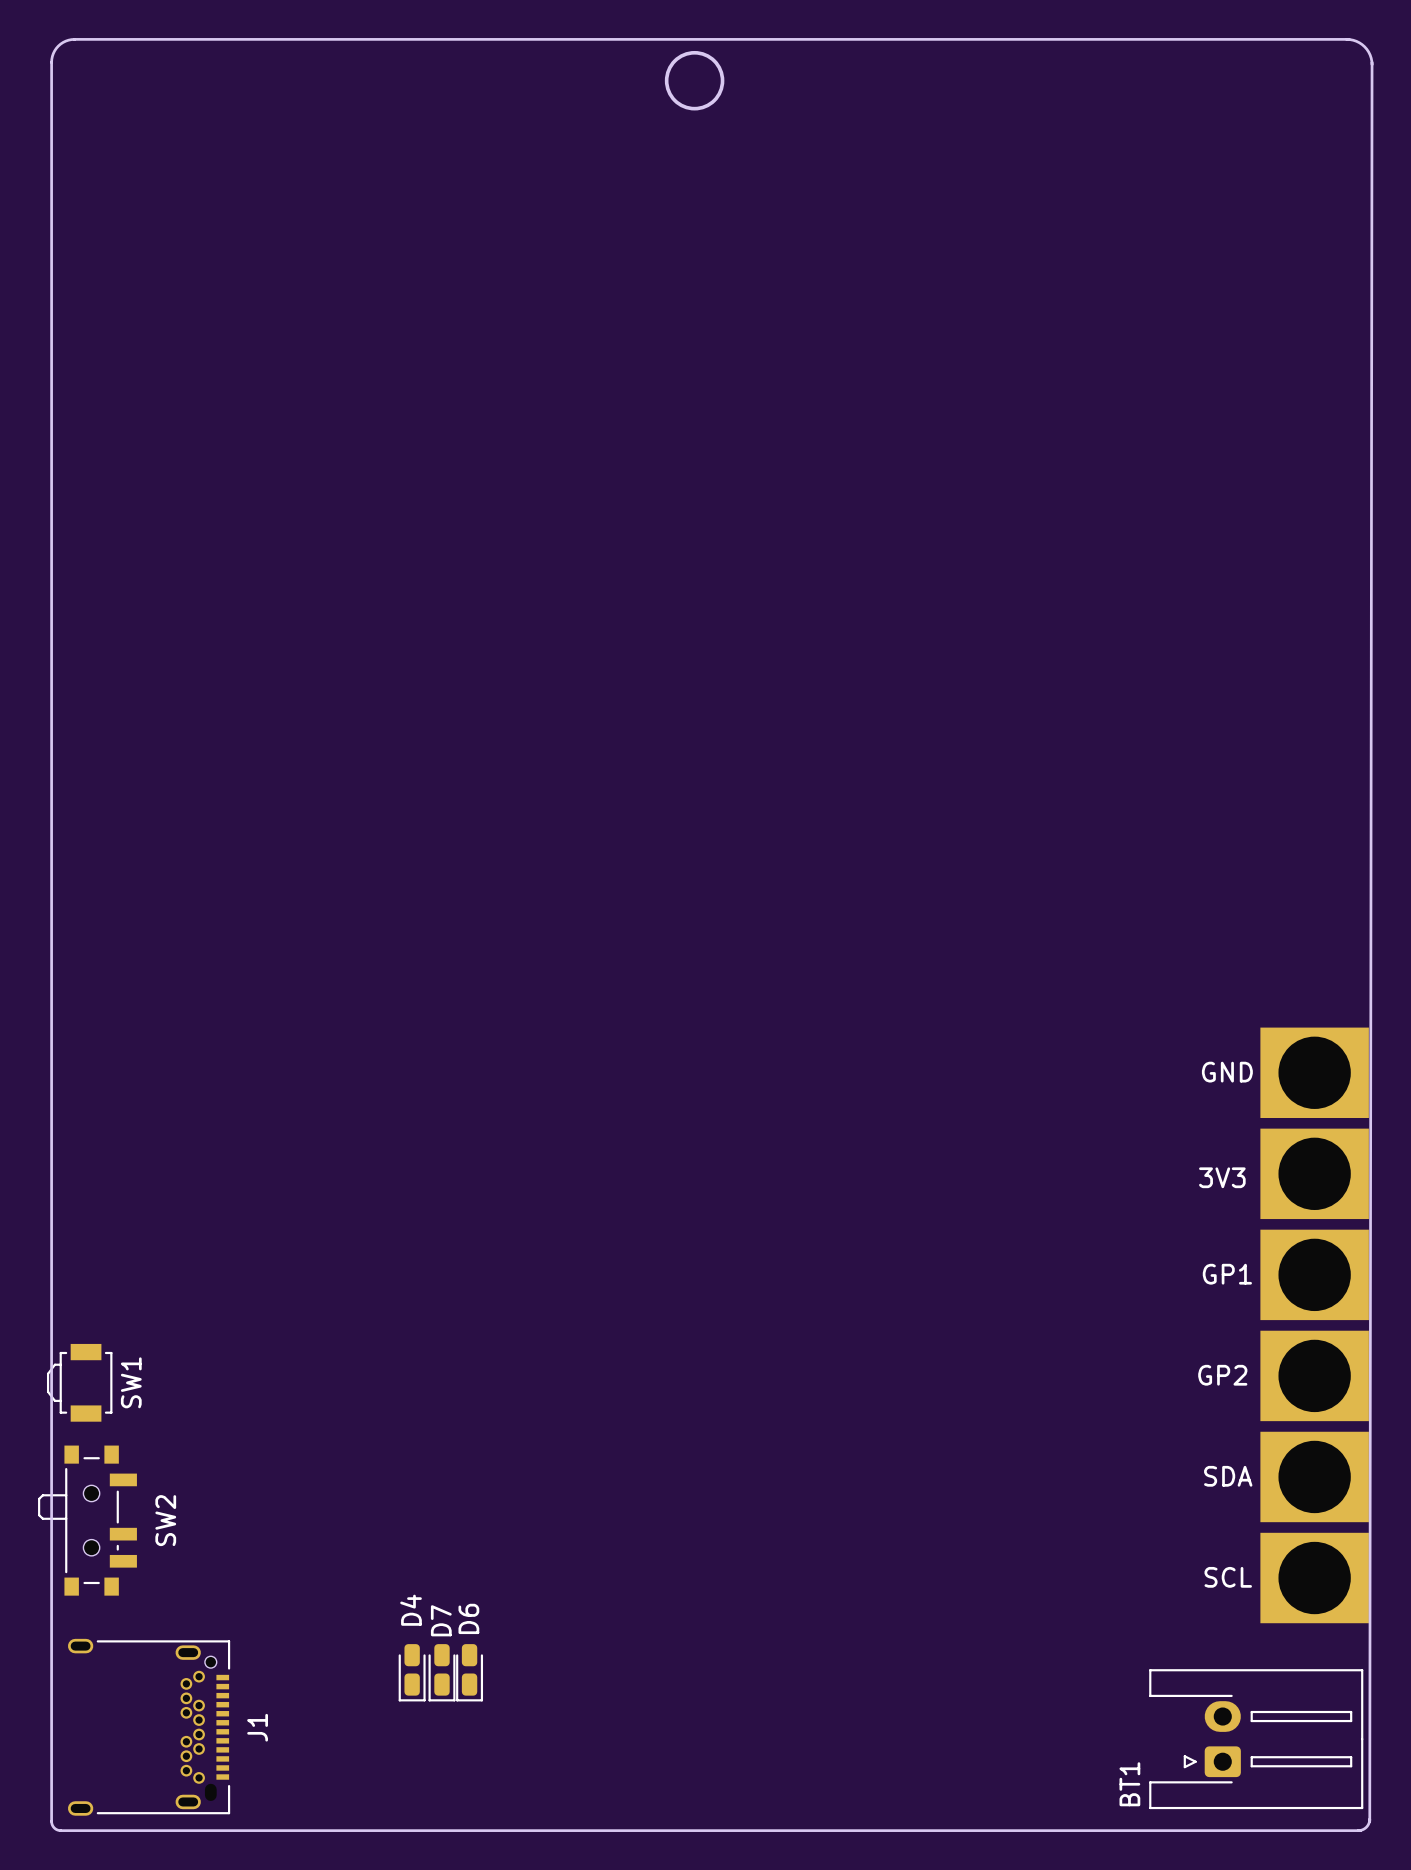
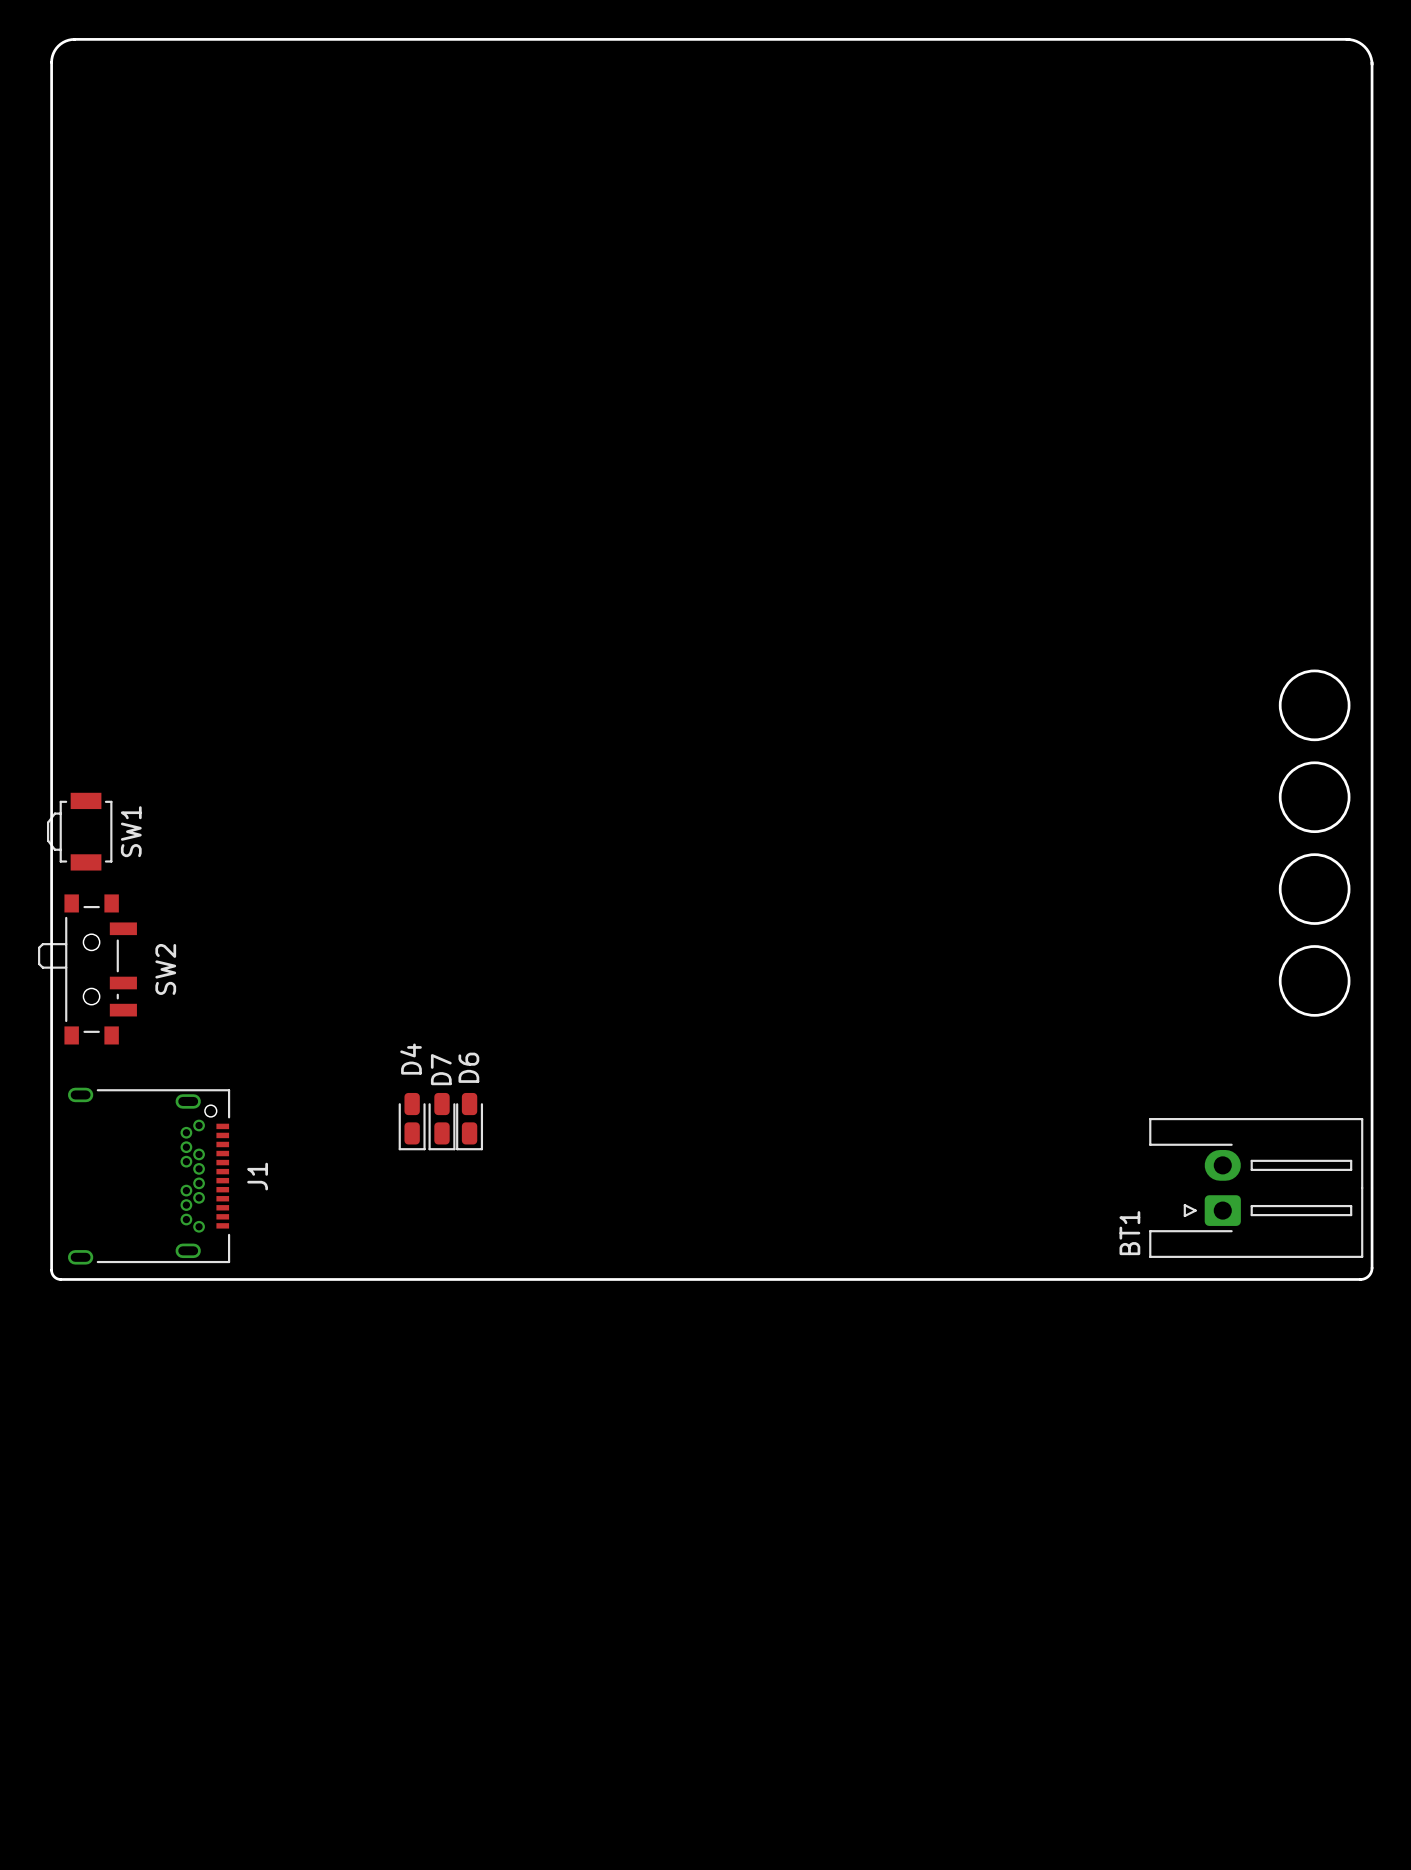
round board edge: [664, 50, 725, 111] -> none
board edge: (1372, 62) (1369, 1821) -> (1372, 62) (1372, 1267) (1368, 1276) (1360, 1279) (60, 1279) (54, 1276) (51, 1270)
round board edge: none -> [1278, 669, 1351, 742]
round board edge: none -> [1278, 761, 1351, 834]
round board edge: none -> [1278, 853, 1351, 925]
round board edge: none -> [1278, 945, 1351, 1017]
GND: (1314, 1072) -> none
3V3: (1314, 1173) -> none
board edge: (51, 1270) (51, 1821) (52, 1826) (57, 1829) (1360, 1830) -> none
GP1: (1314, 1274) -> none
GP2: (1314, 1375) -> none
SW1 position: (79, 1382) -> (79, 831)
SDA: (1314, 1476) -> none
SW2 position: (87, 1520) -> (87, 969)
SCL: (1314, 1578) -> none
D4 position: (412, 1672) -> (412, 1121)
D7 position: (441, 1672) -> (441, 1121)
D6 position: (469, 1672) -> (469, 1121)
J1 position: (149, 1727) -> (149, 1176)
BT1 position: (1256, 1739) -> (1256, 1187)
board edge: (1369, 1819) (1366, 1827) (1358, 1830) -> none

